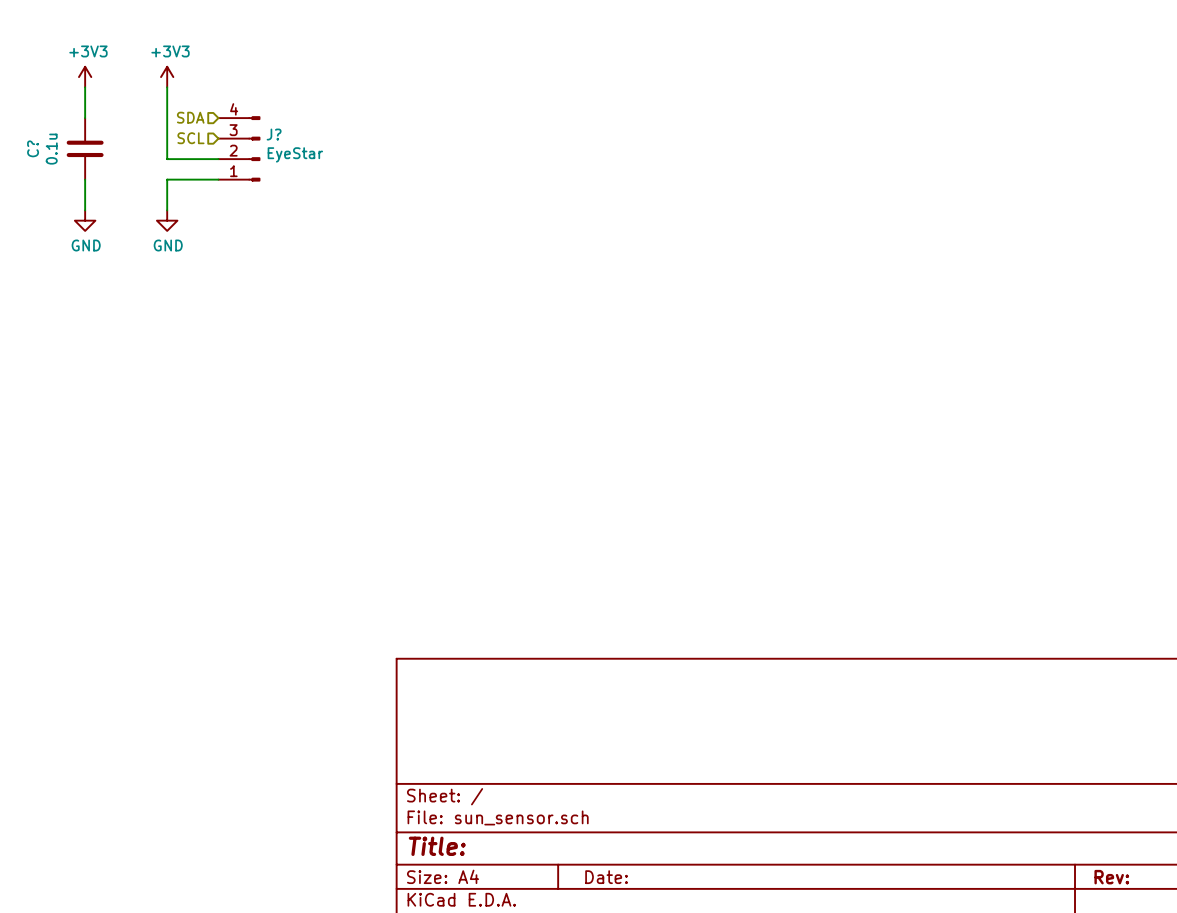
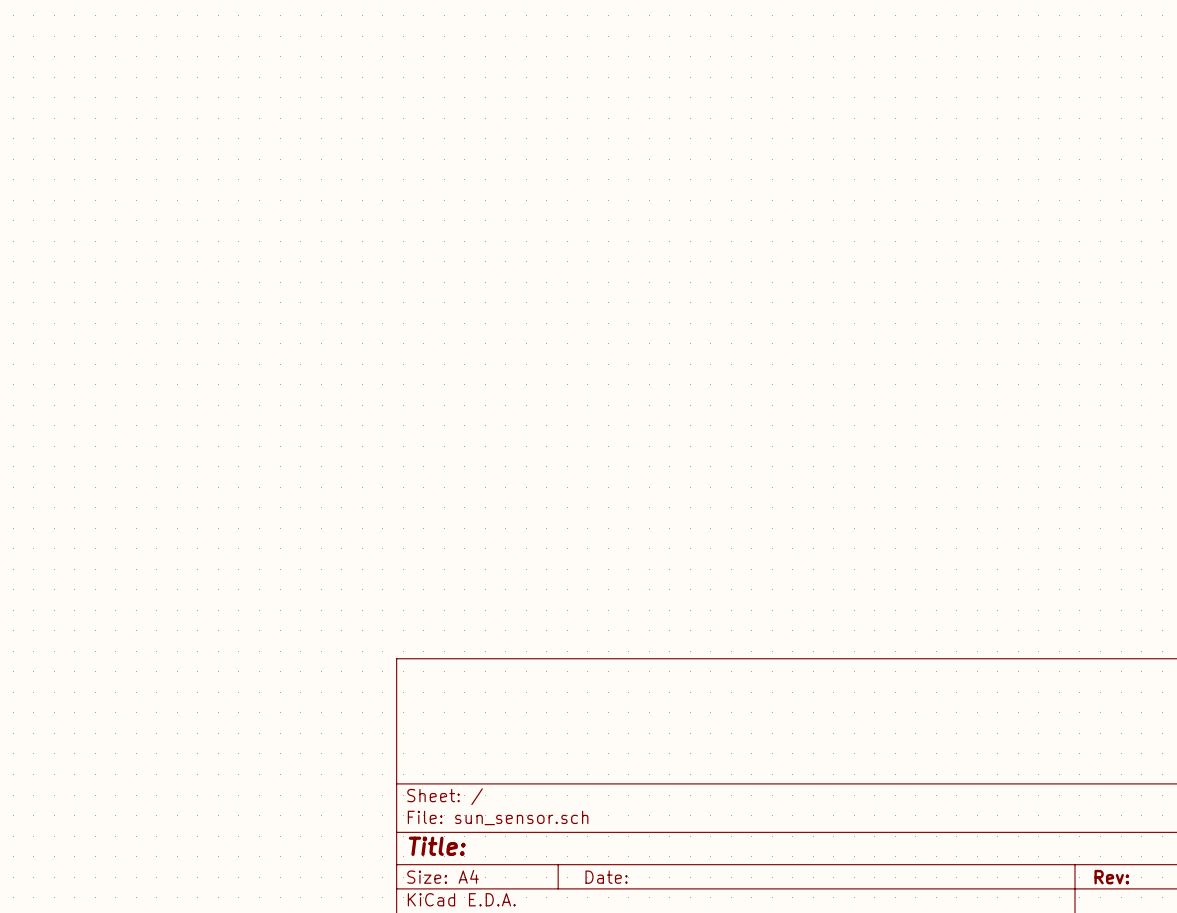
power symbol: +3V3 (85, 77) -> none
power symbol: +3V3 (167, 77) -> none
wire: (85, 87) (85, 118) -> none
wire: (167, 87) (167, 159) (218, 159) -> none
hierarchical label: SDA (190, 117) -> none
hierarchical label: SCL (190, 138) -> none
C?: 0.1u (85, 148) -> none
J?: EyeStar (239, 148) -> none
wire: (85, 179) (85, 210) -> none
wire: (218, 179) (167, 179) (167, 210) -> none
power symbol: GND (85, 220) -> none
power symbol: GND (167, 220) -> none

